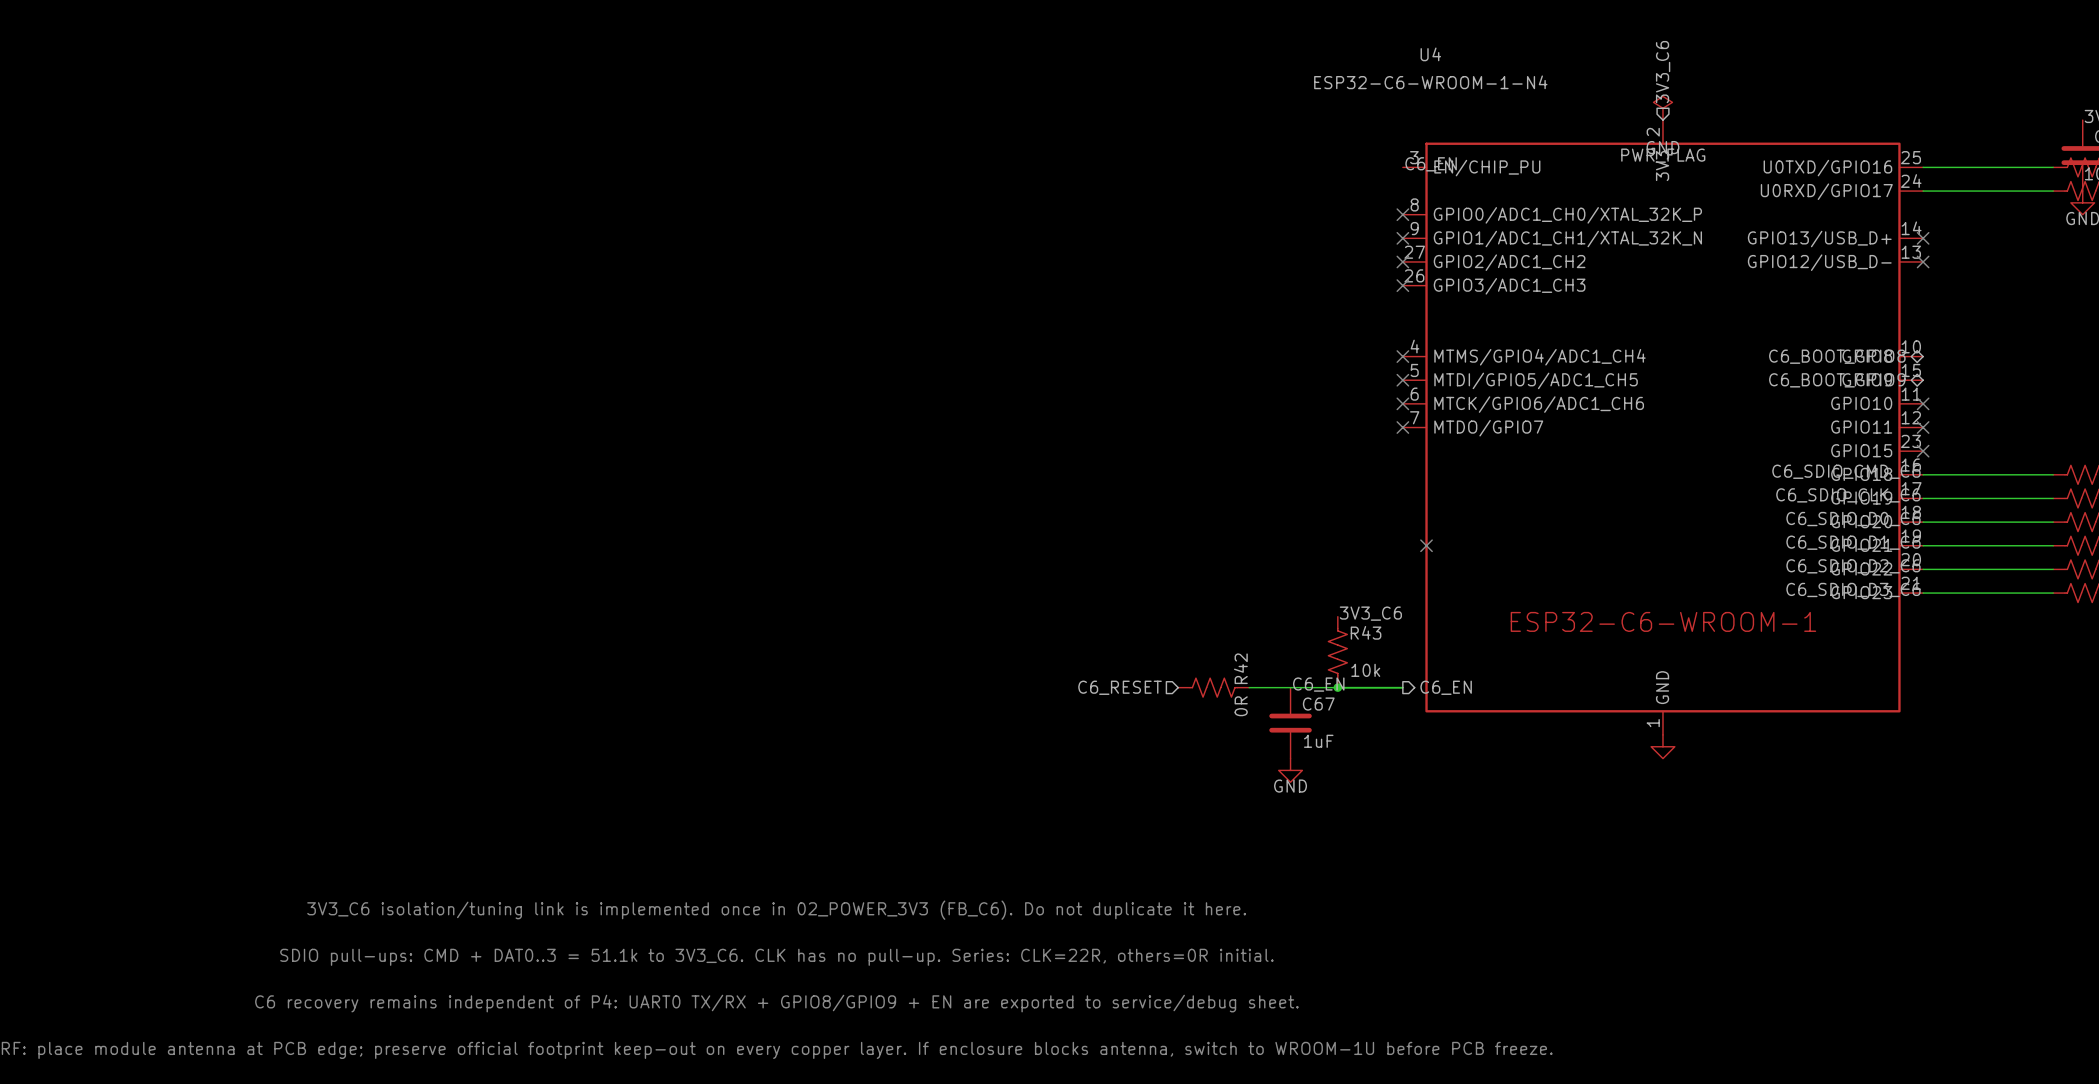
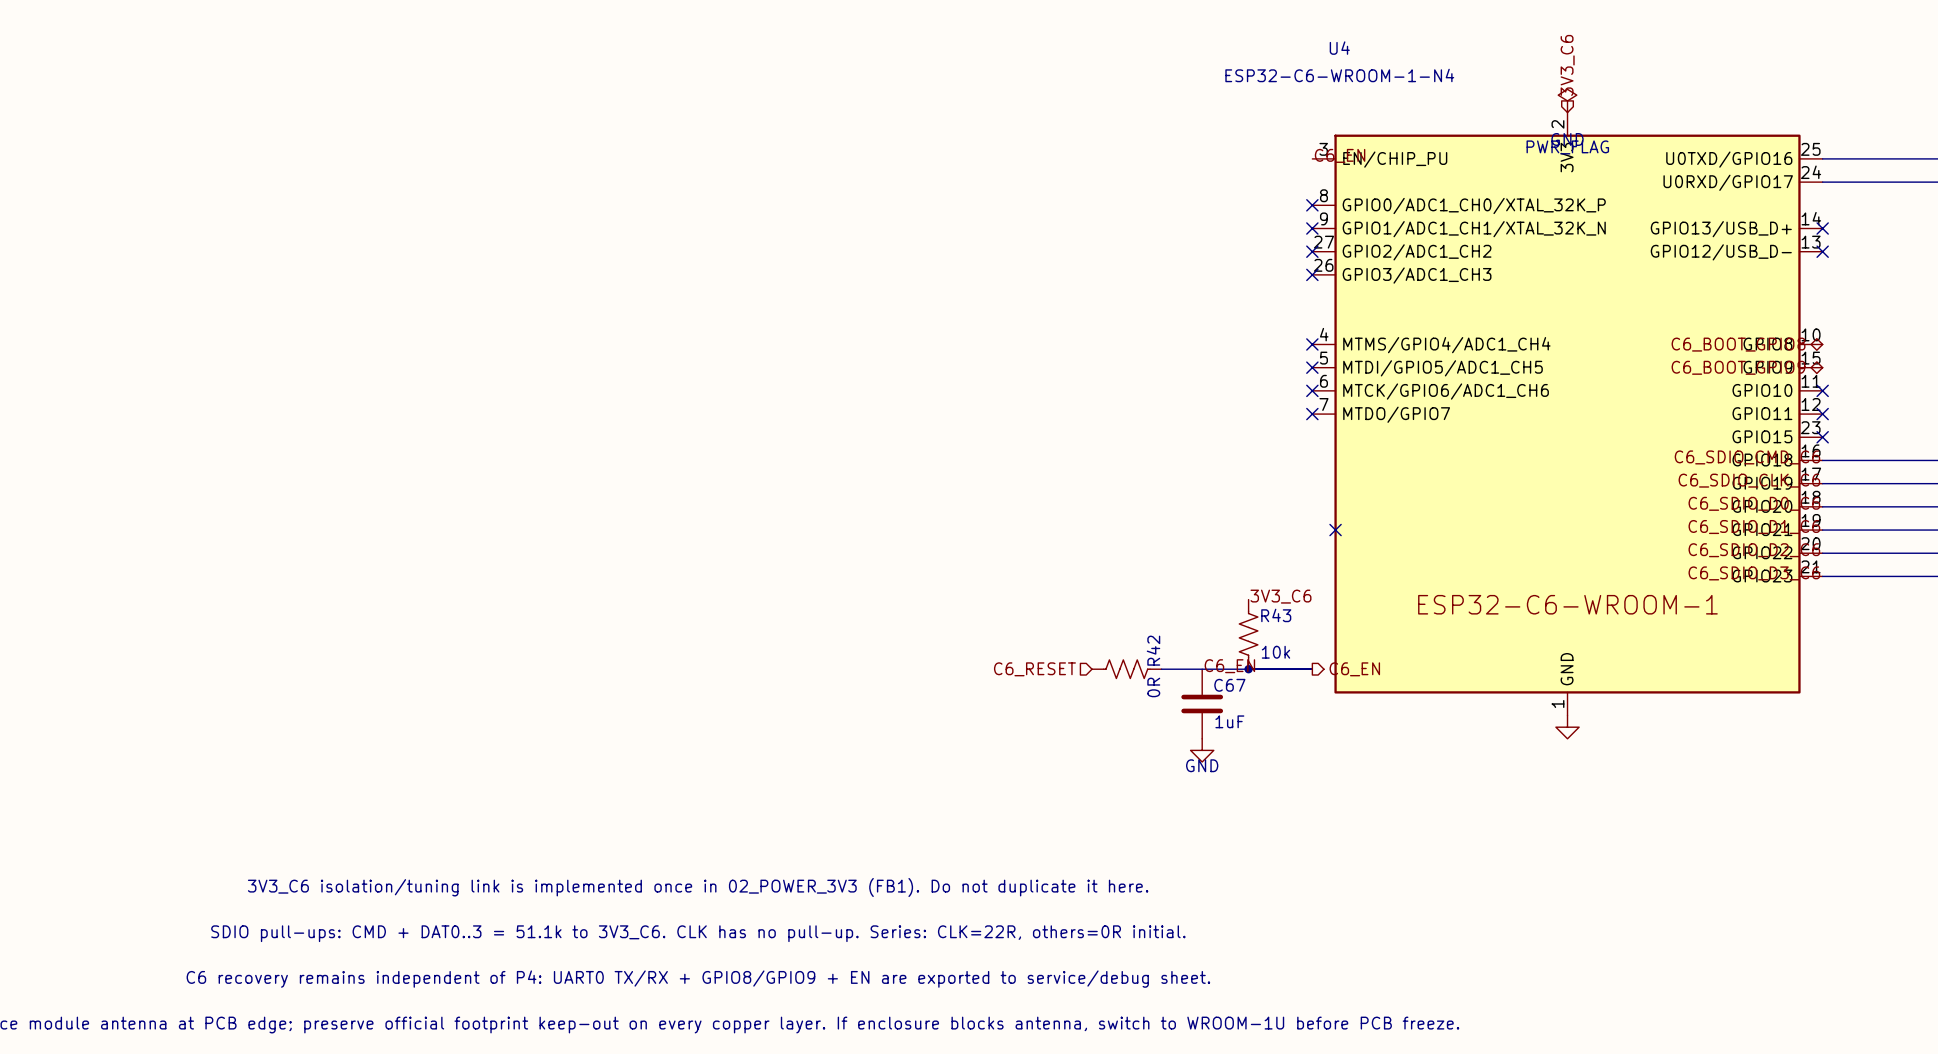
text: 3V3_C6 isolation/tuning link is implemented once in 02_POWER_3V3 (FB_C6). Do not duplicate it here. (776, 910) -> 3V3_C6 isolation/tuning link is implemented once in 02_POWER_3V3 (FB1). Do not duplicate it here. (698, 887)

